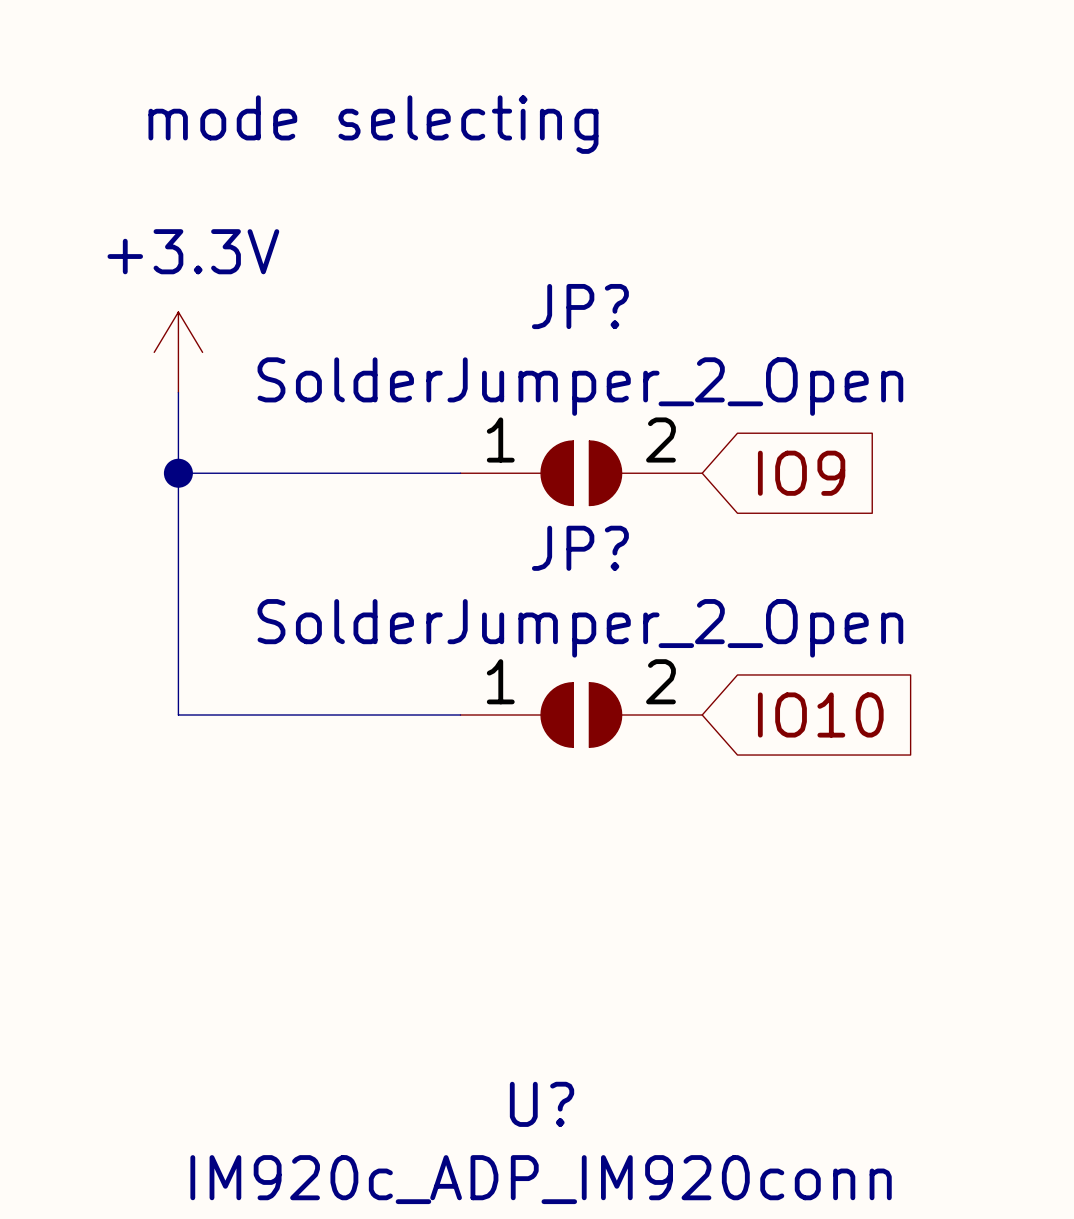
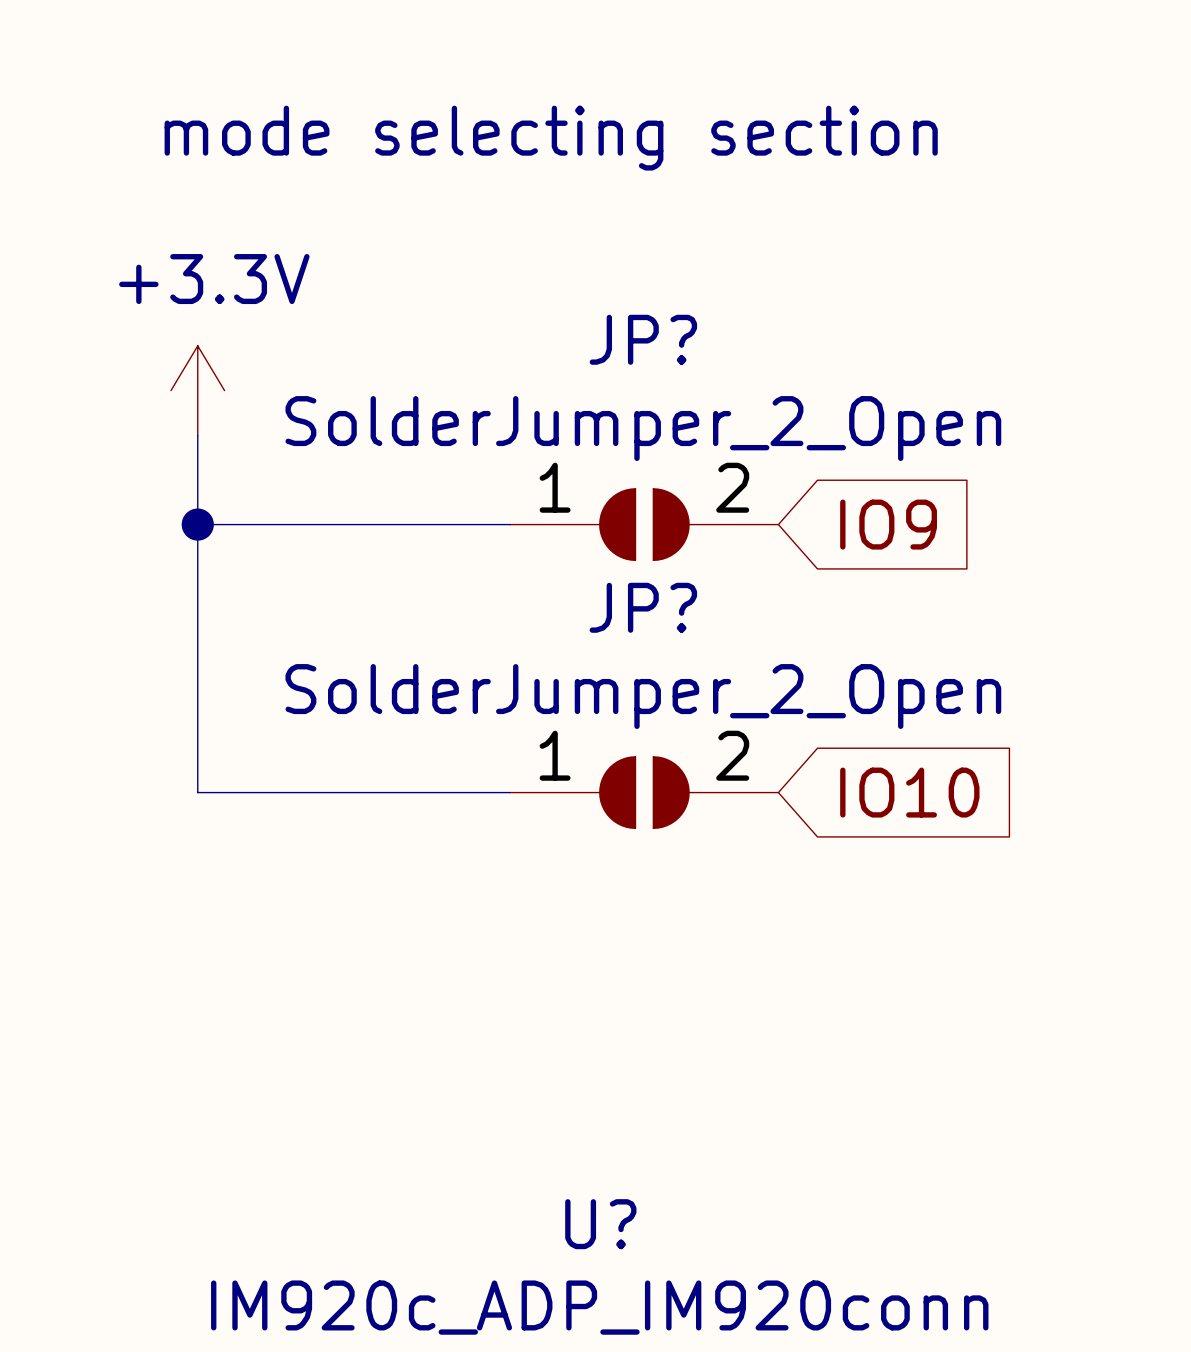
text: mode selecting (373, 124) -> mode selecting section (551, 138)

